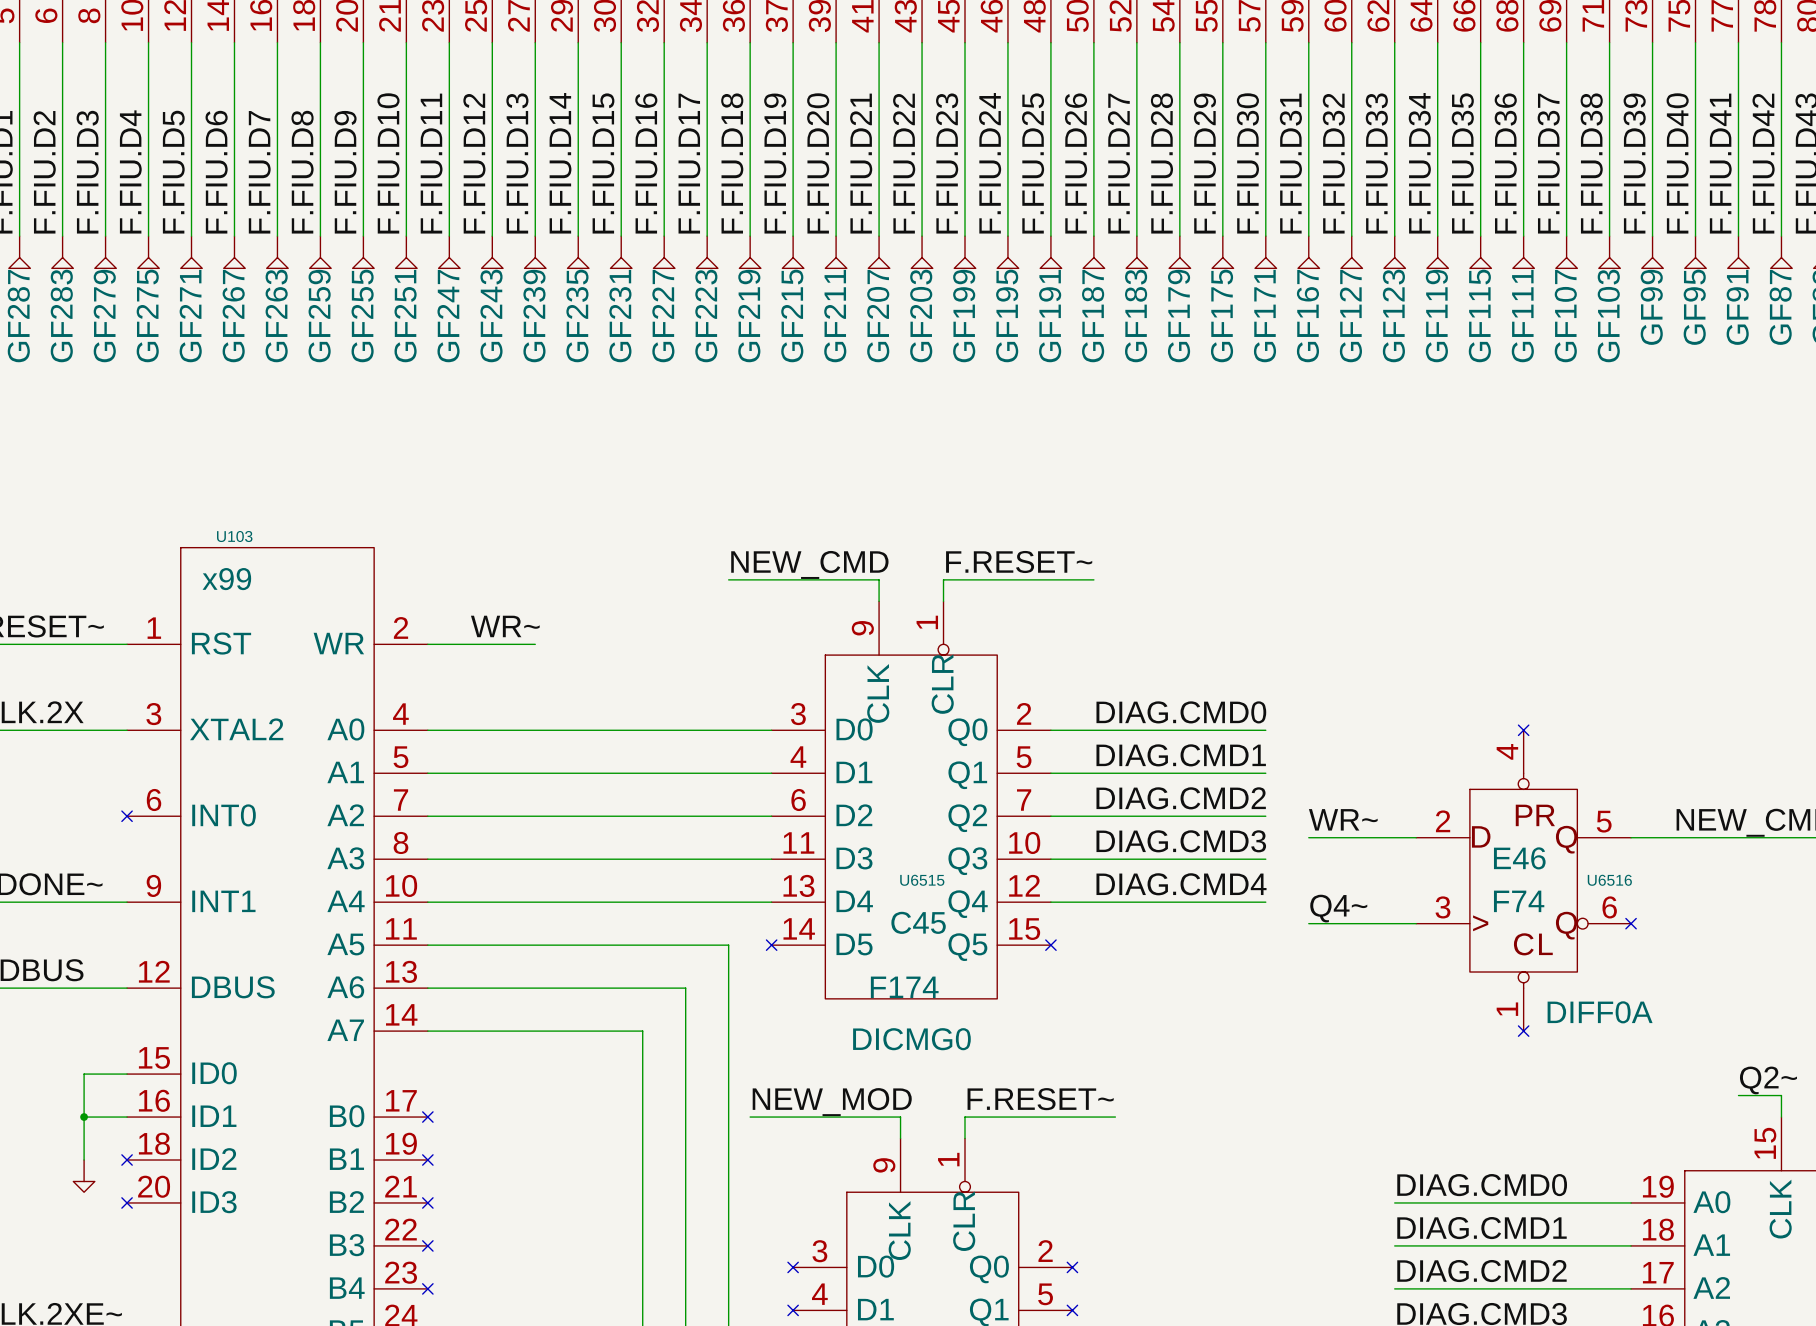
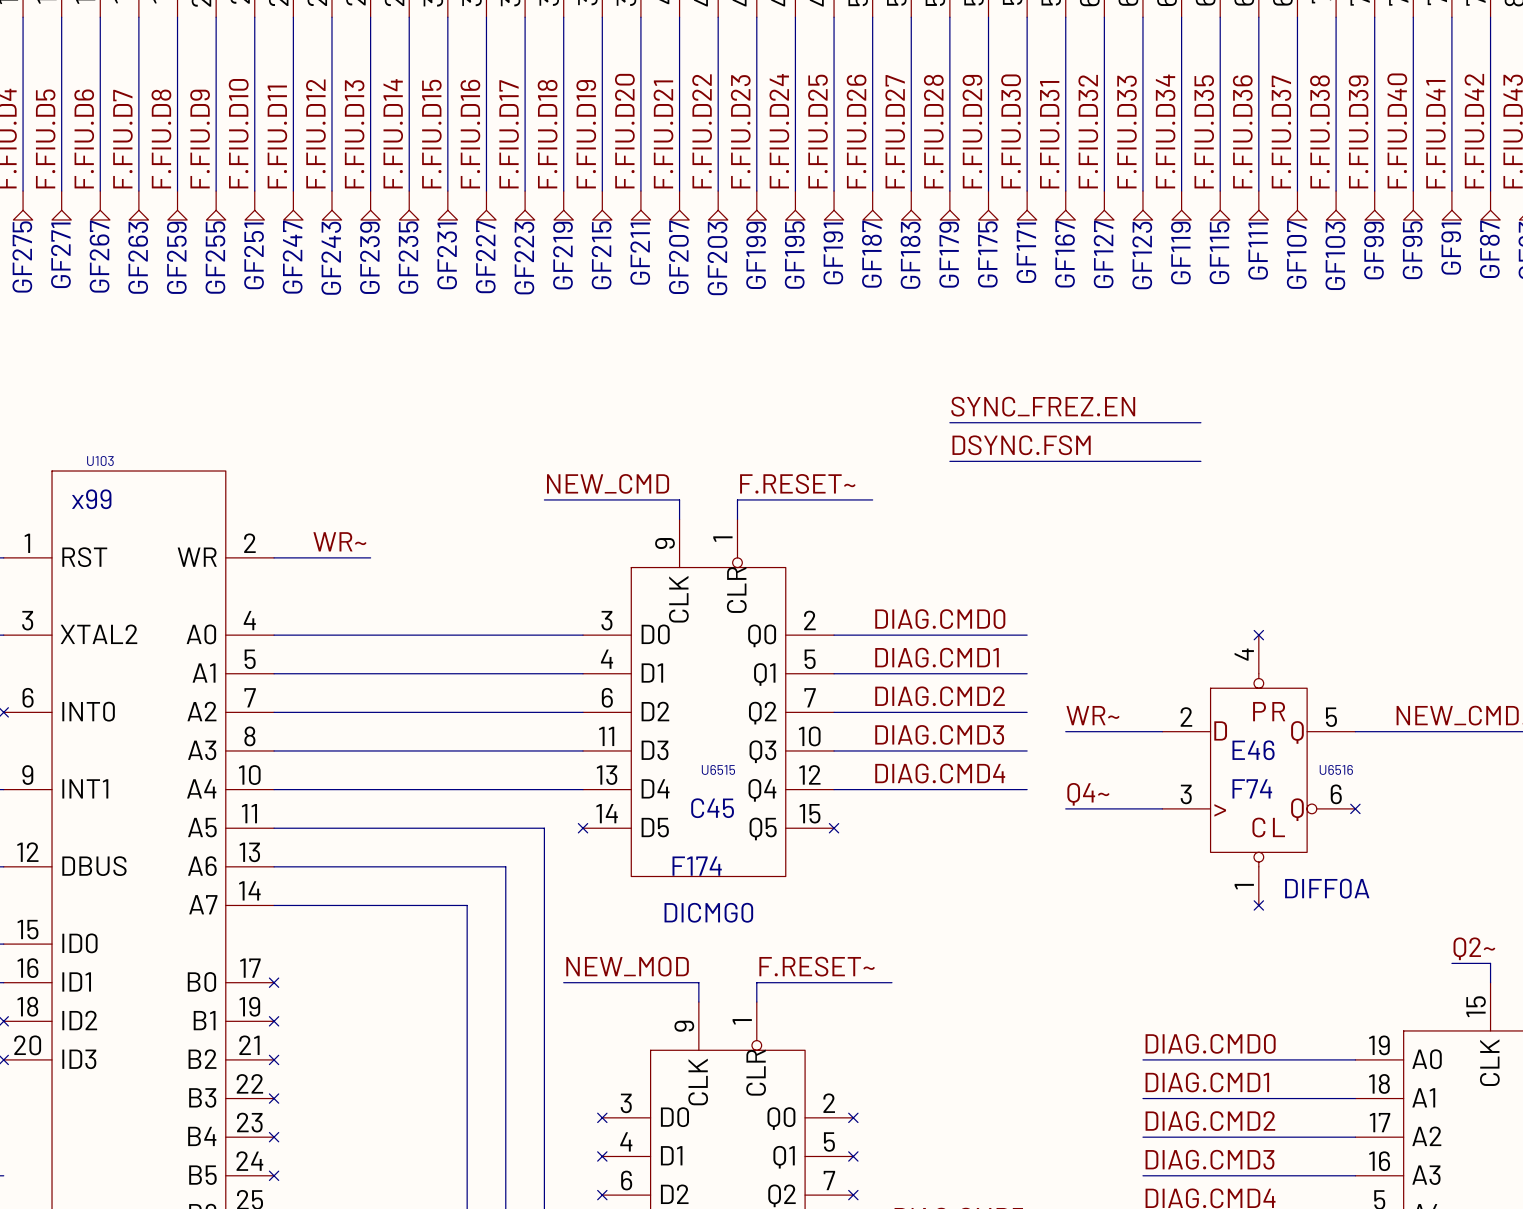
label: none -> SYNC_FREZ.EN (1043, 406)
wire: none -> (949, 422) (1200, 422)
label: none -> DSYNC.FSM (1021, 445)
wire: none -> (949, 461) (1200, 461)

